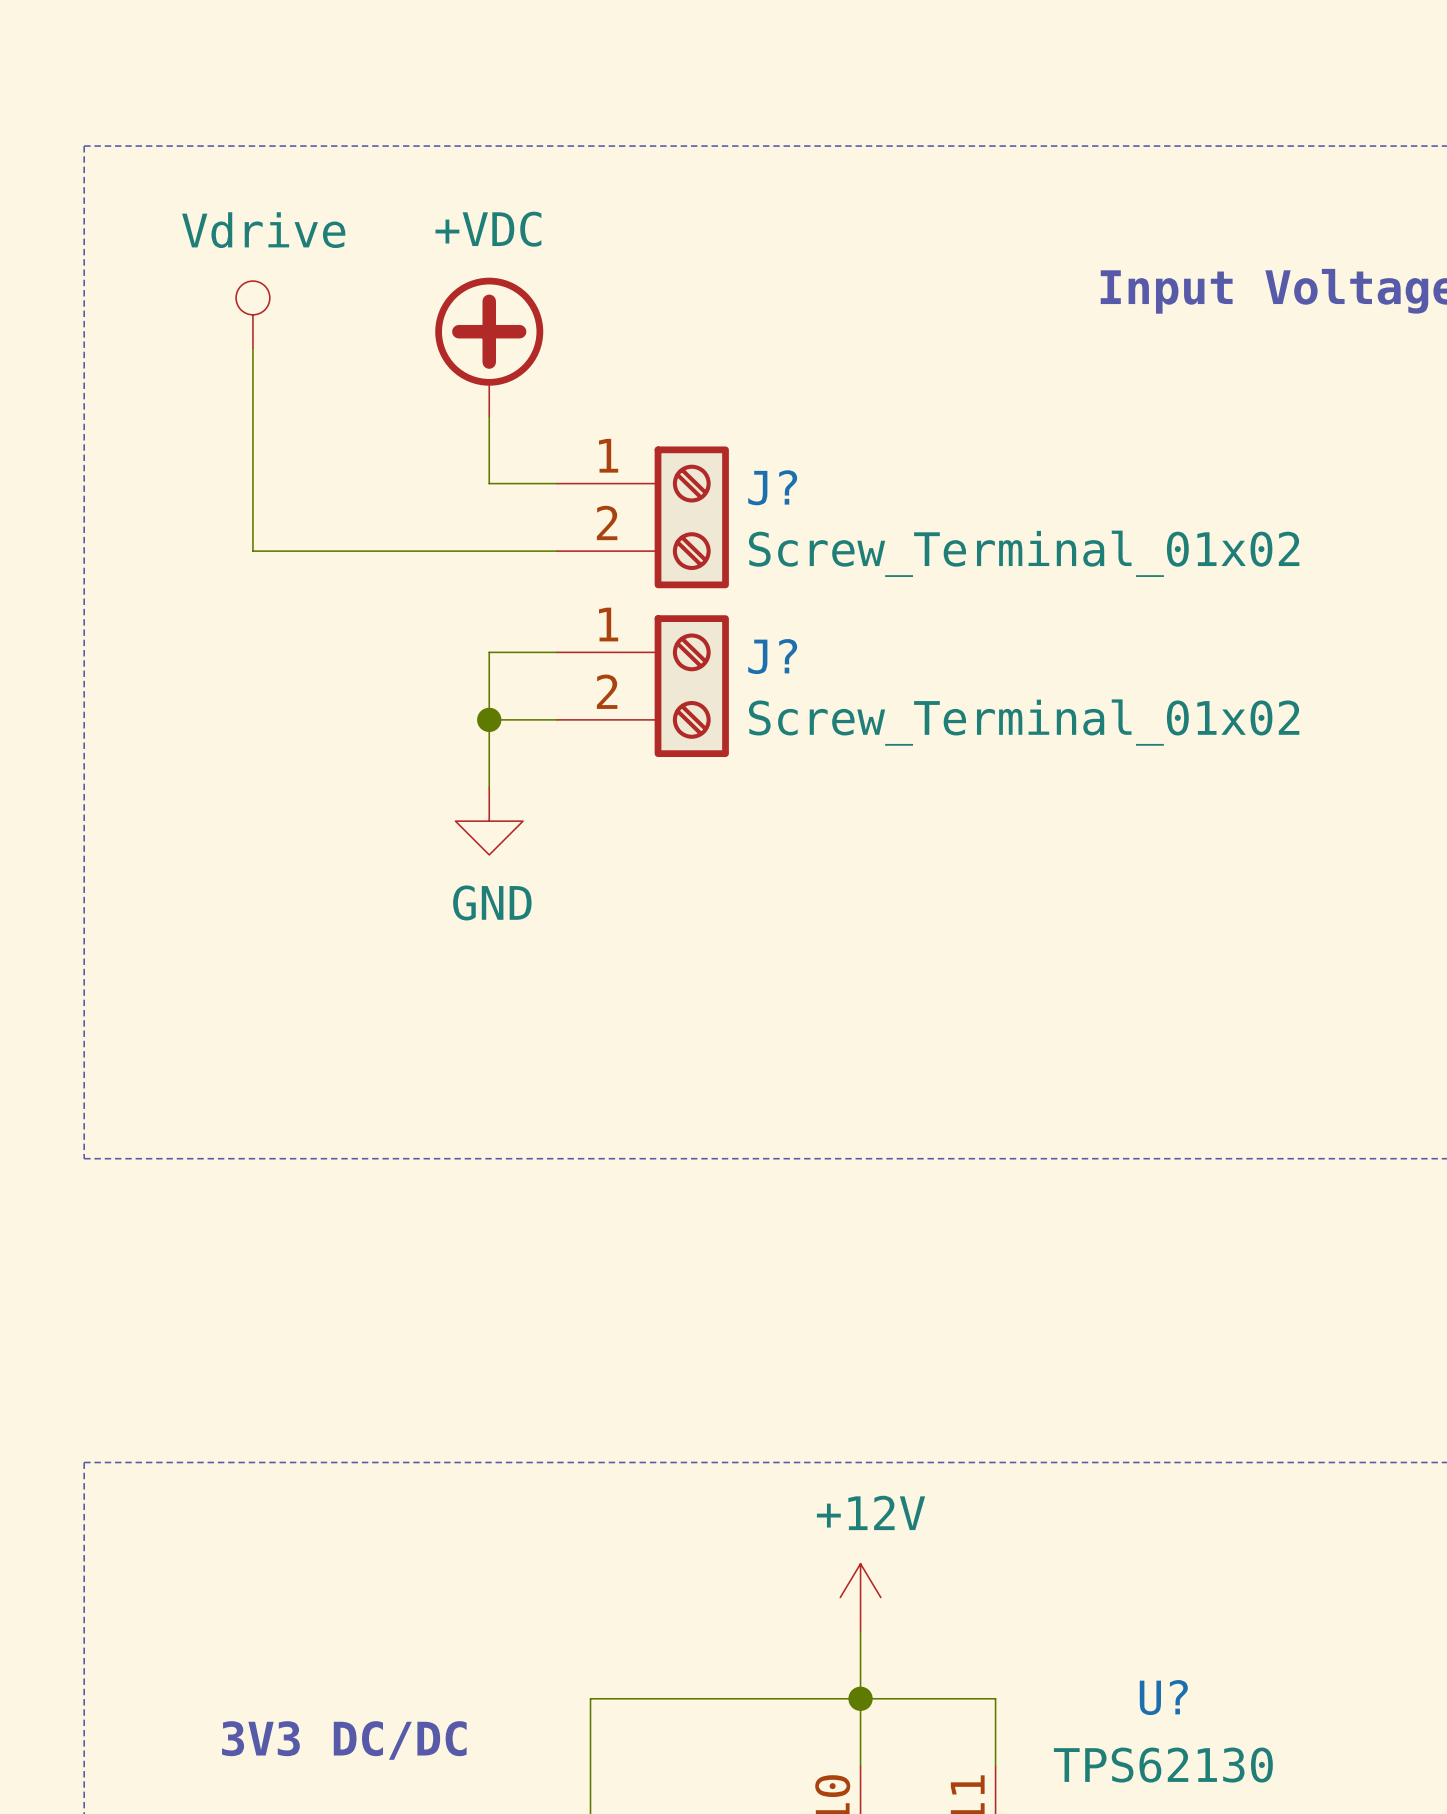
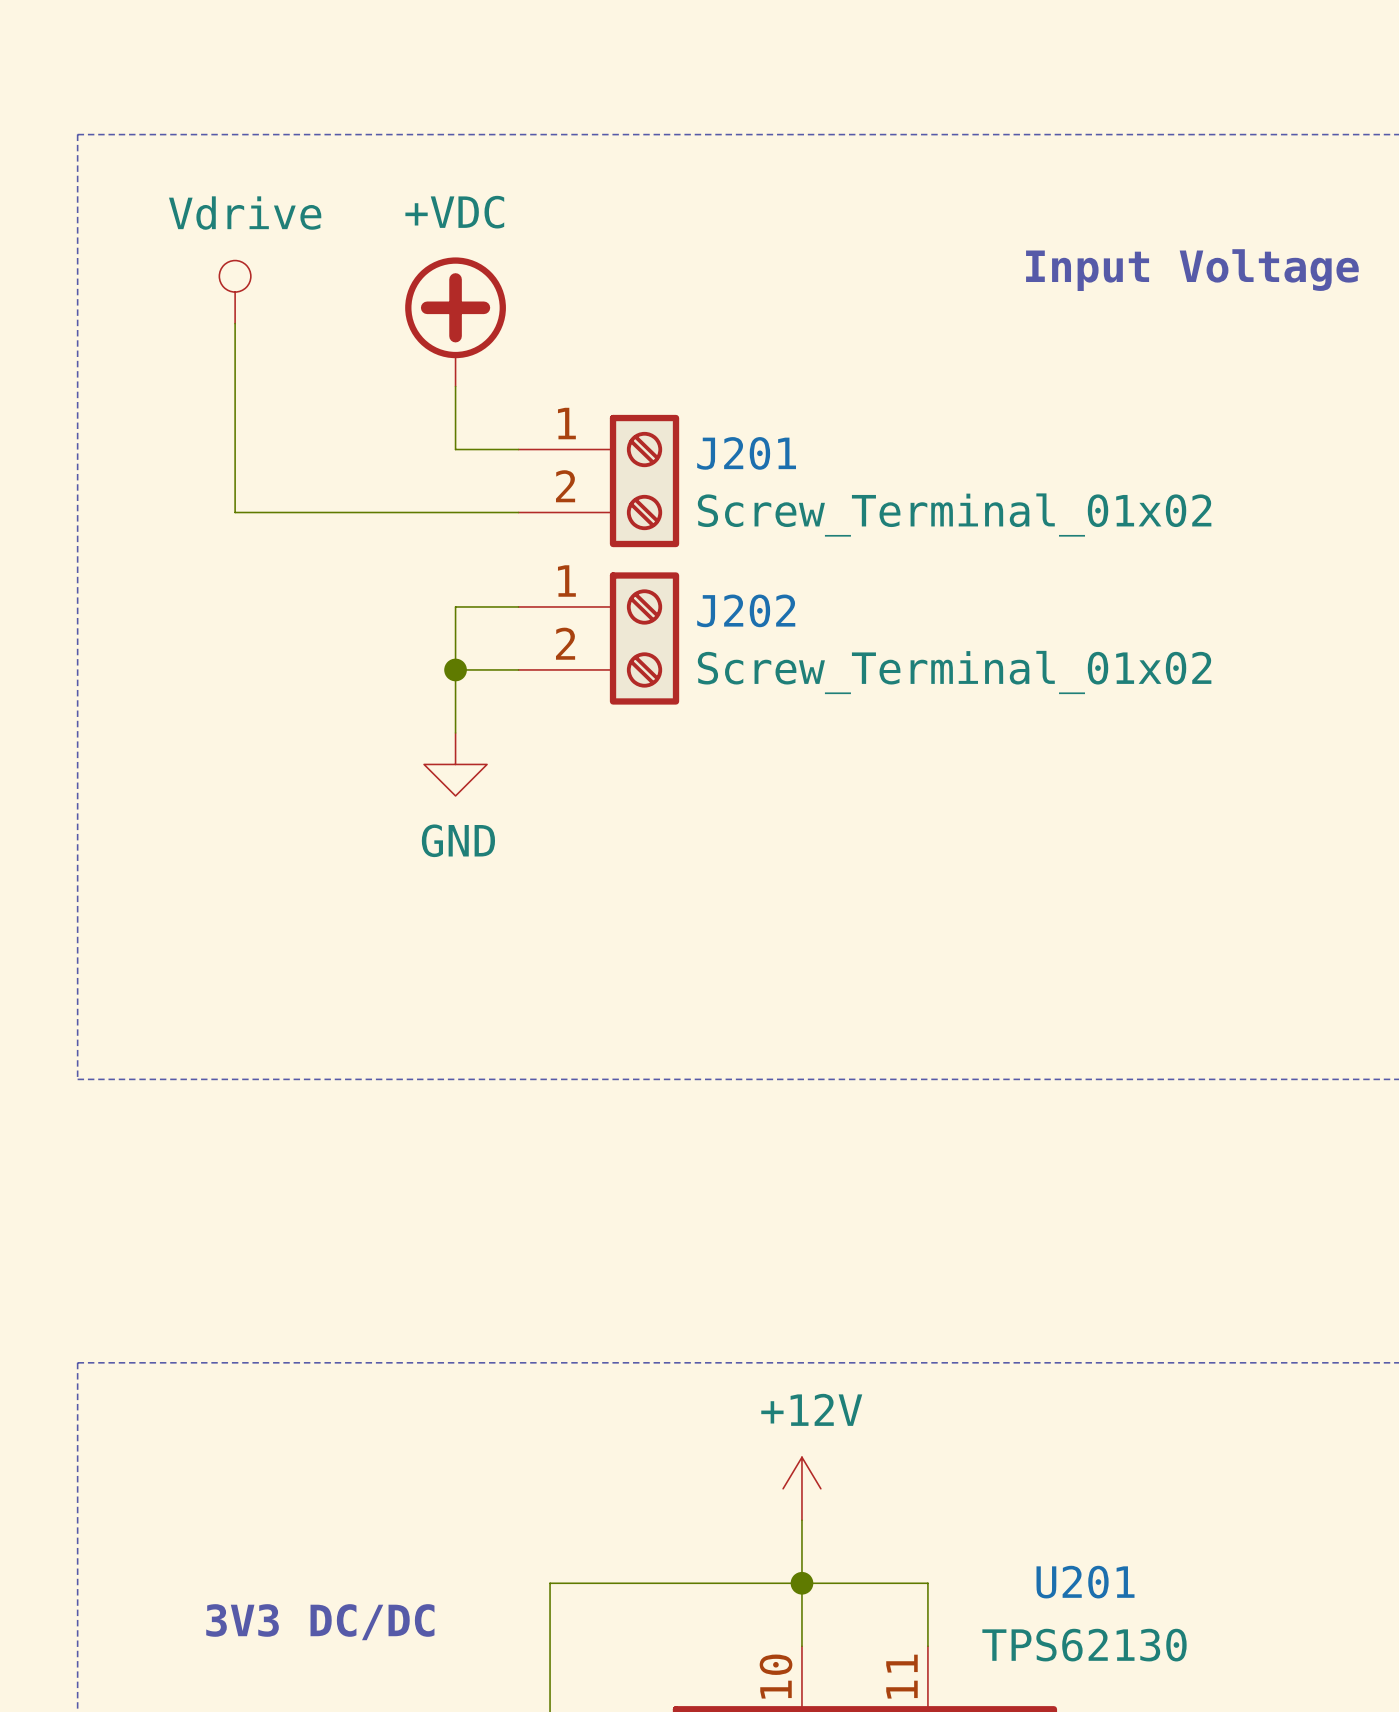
J? name: J? (772, 487) -> J201 (746, 453)
J? name: J? (772, 656) -> J202 (746, 610)
U? name: U? (1163, 1697) -> U201 (1085, 1582)

